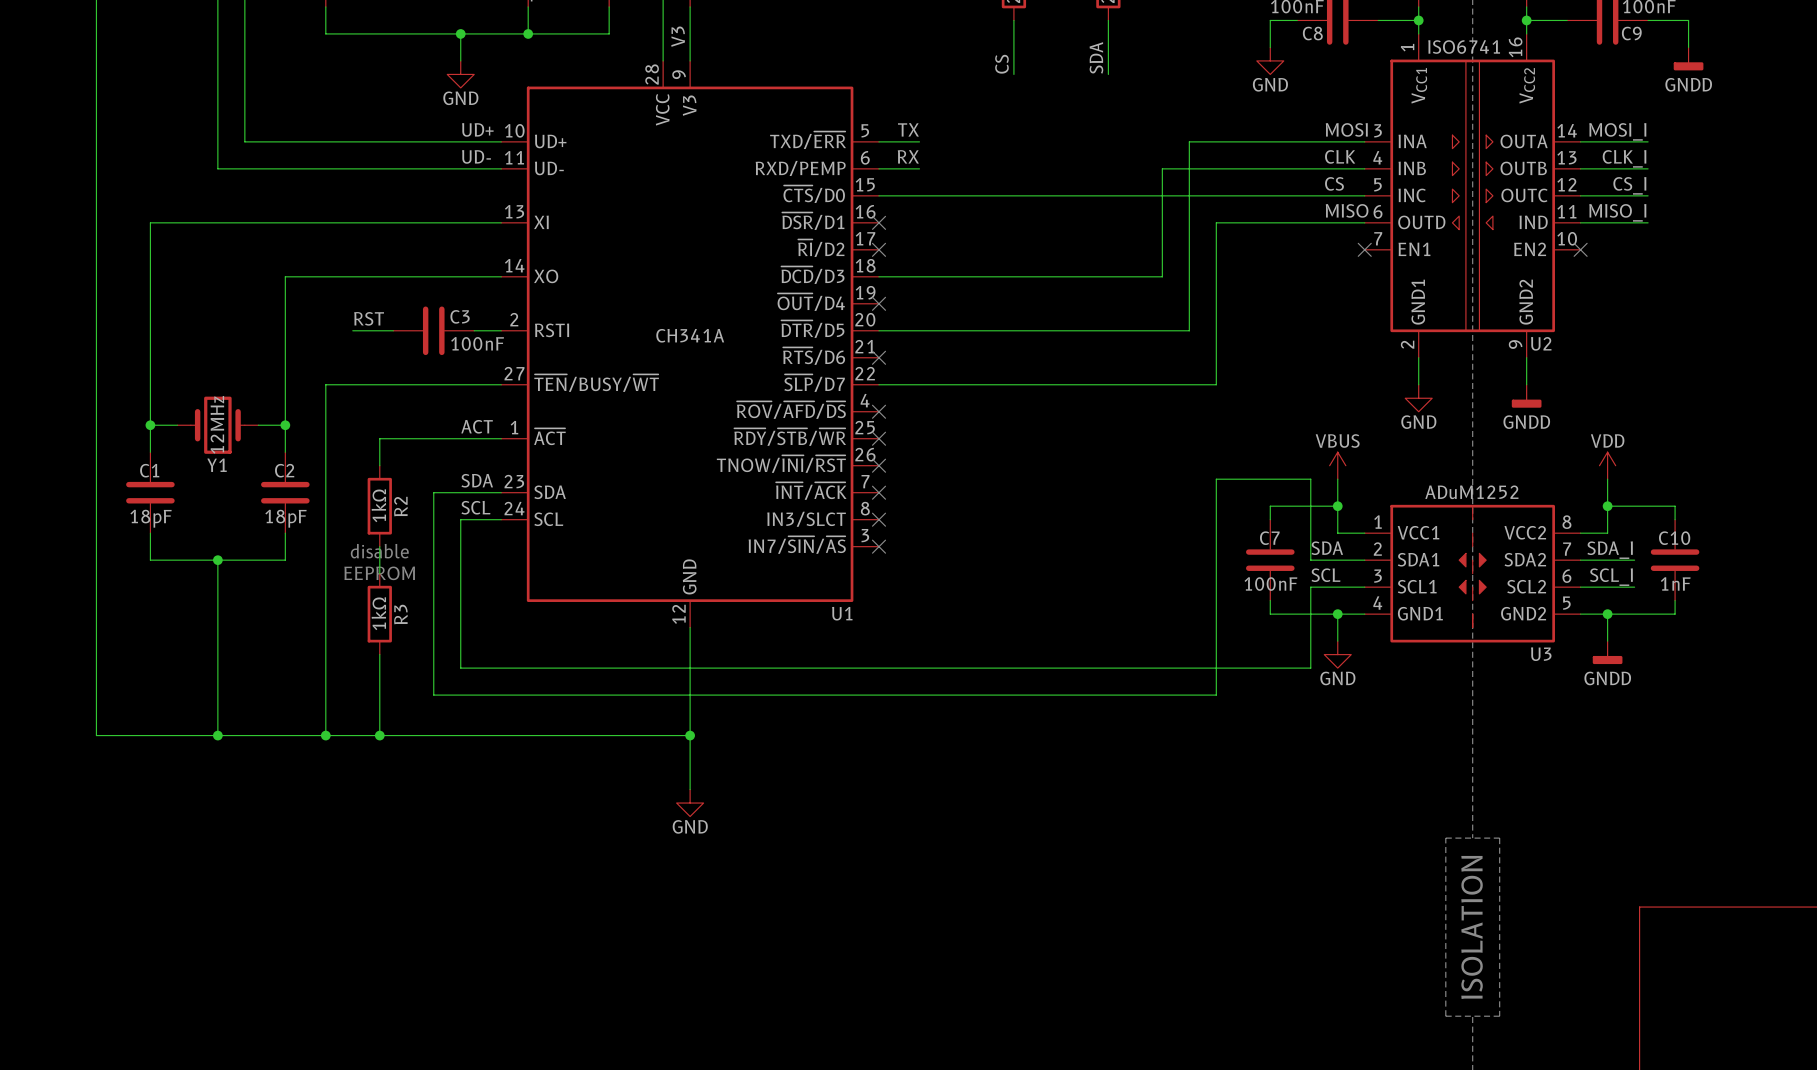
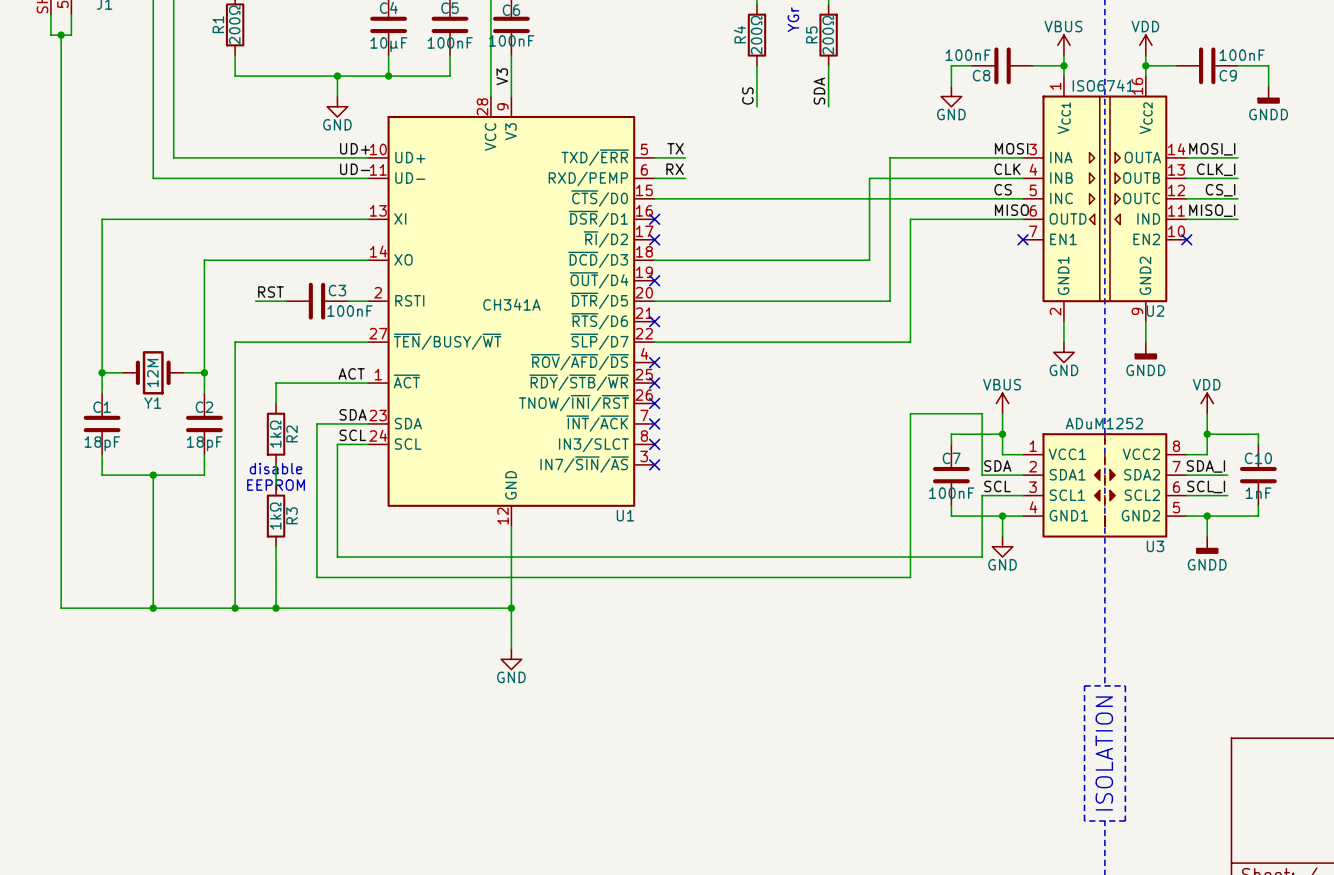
Y1 value: 12MHz (217, 424) -> 12M (152, 373)

